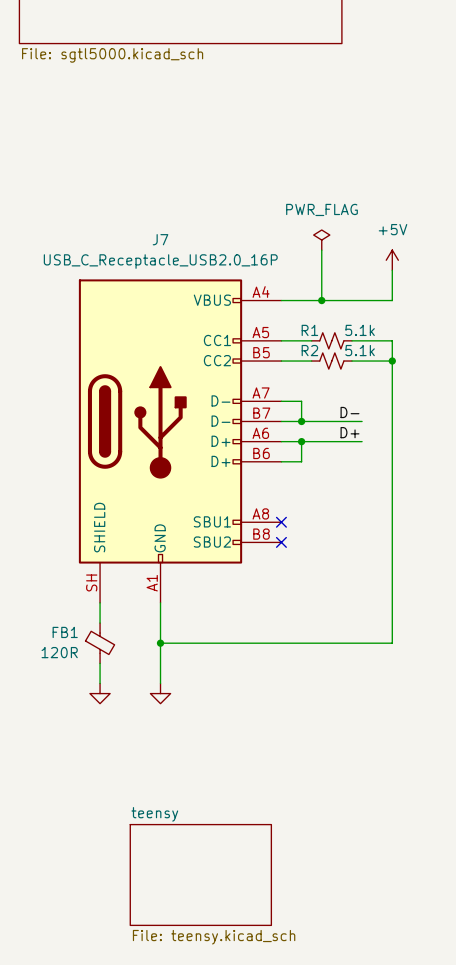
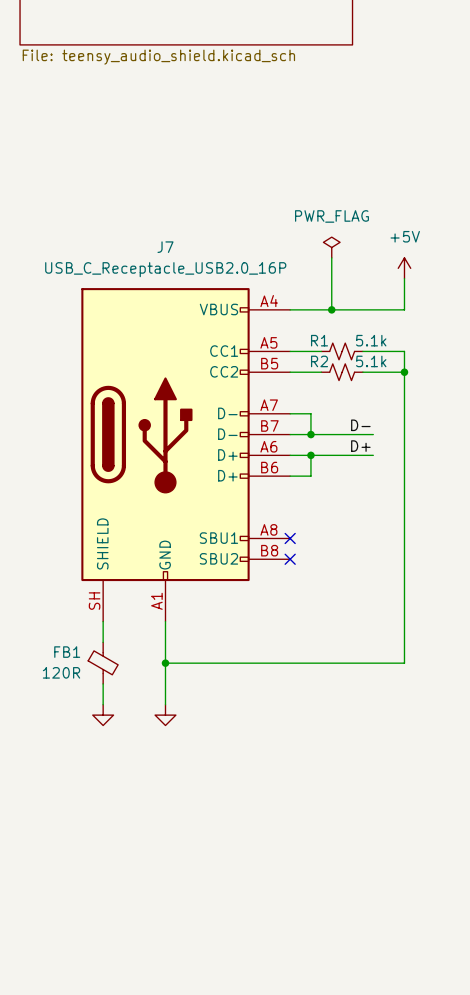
sheet value: File: sgtl5000.kicad_sch (112, 55) -> File: teensy_audio_shield.kicad_sch (158, 57)
sheet teensy: File: teensy.kicad_sch (200, 874) -> none

